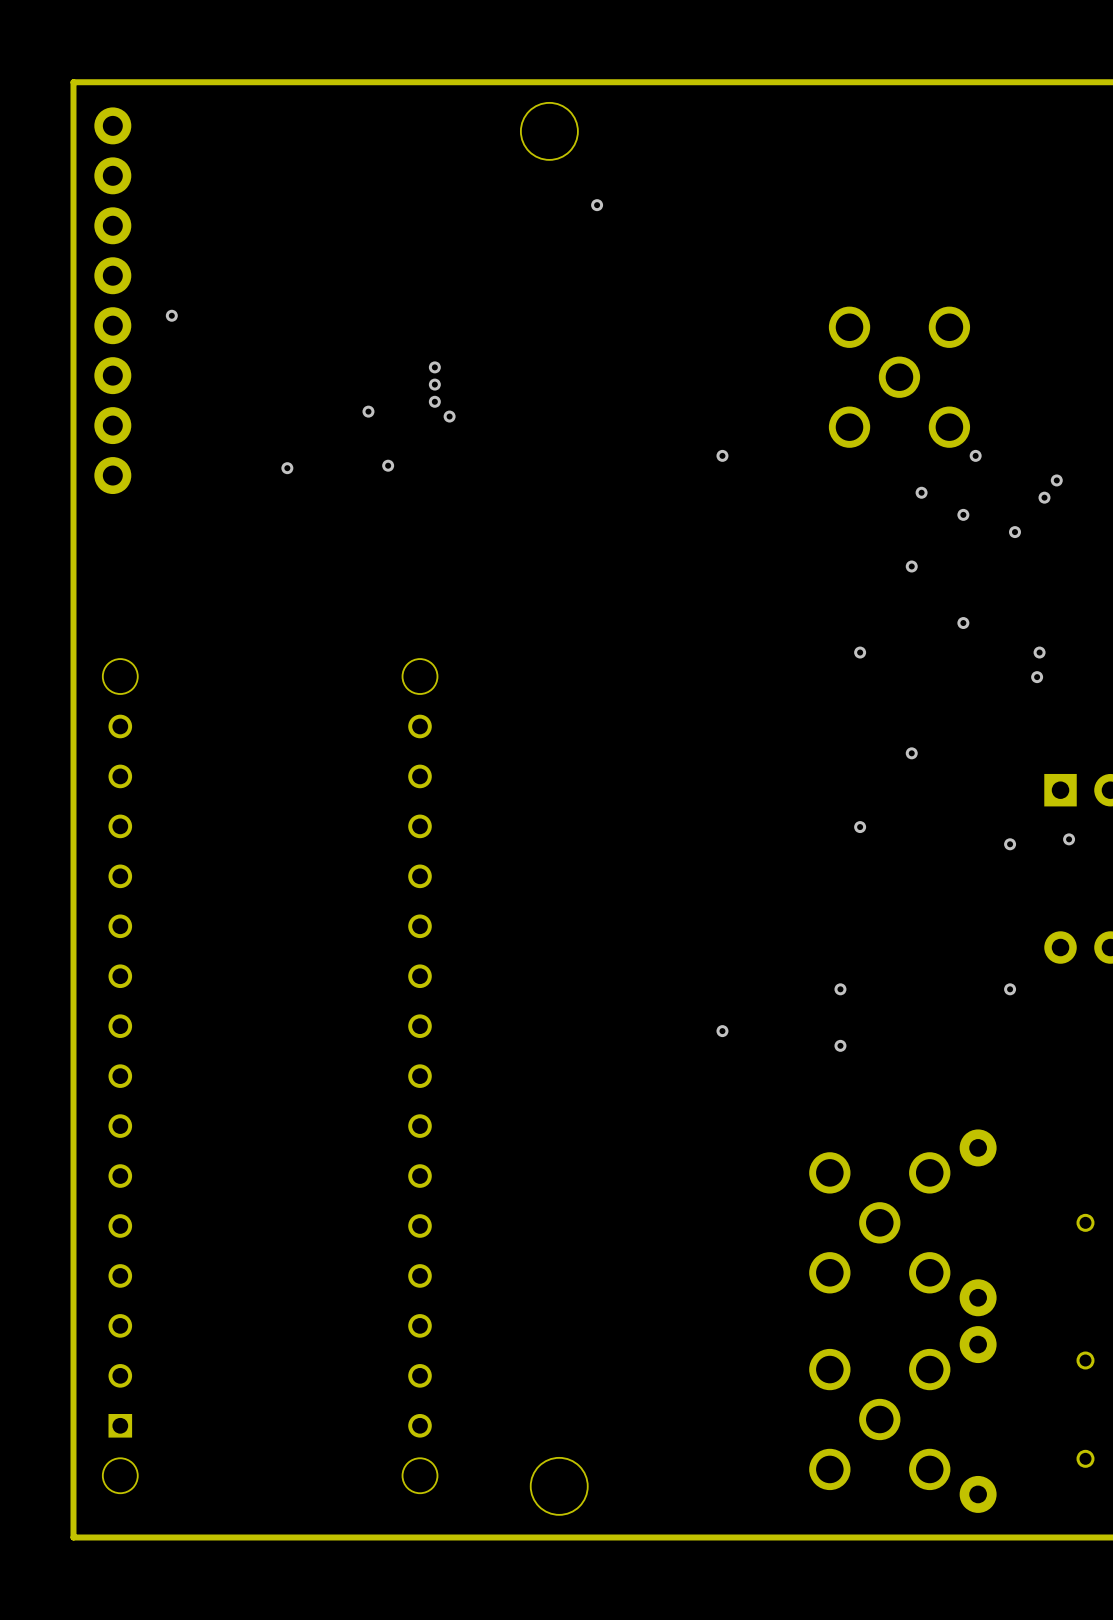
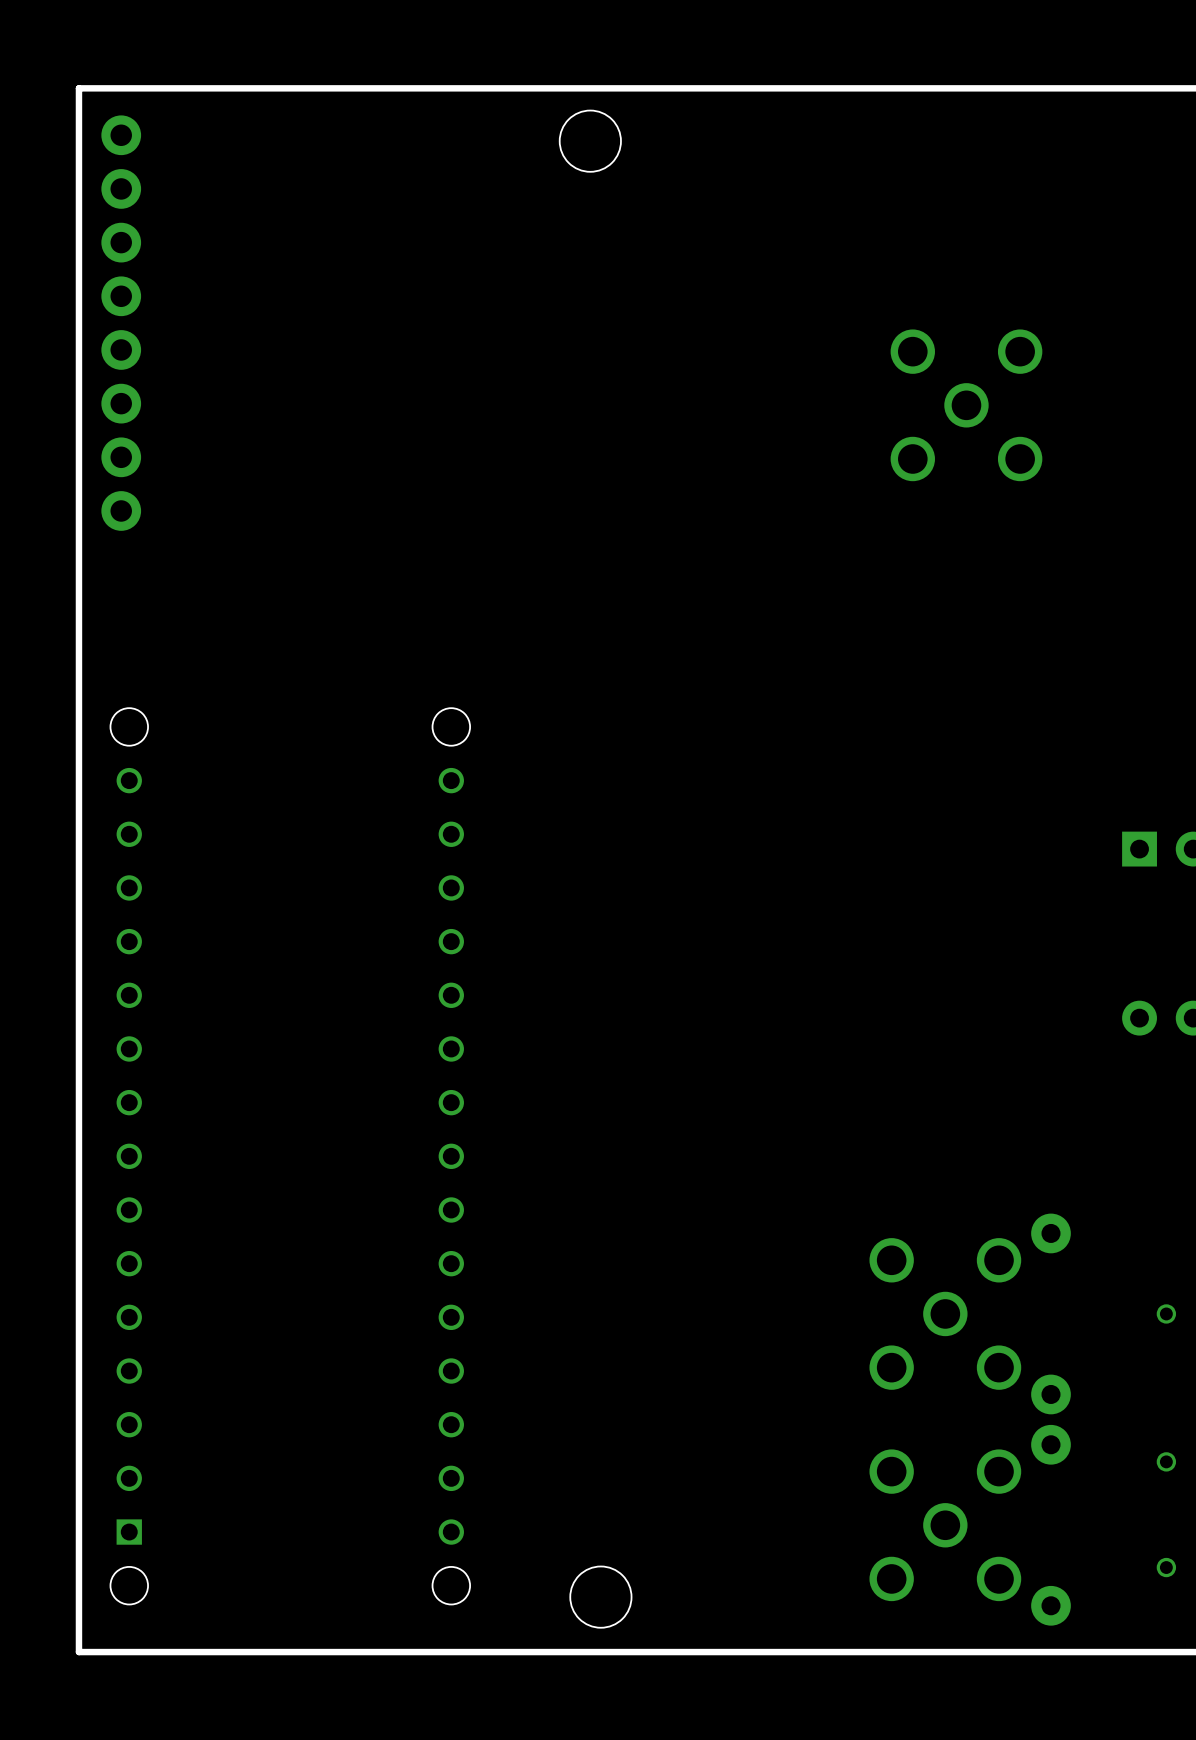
via: (597, 205) -> none
via: (171, 315) -> none
via: (434, 367) -> none
via: (434, 384) -> none
via: (434, 401) -> none
via: (368, 411) -> none
via: (449, 416) -> none
via: (722, 455) -> none
via: (975, 455) -> none
via: (388, 465) -> none
via: (287, 468) -> none
via: (1056, 480) -> none
via: (921, 492) -> none
via: (1044, 497) -> none
via: (963, 514) -> none
via: (1014, 532) -> none
via: (911, 566) -> none
via: (963, 623) -> none
via: (860, 652) -> none
via: (1039, 652) -> none
via: (1037, 677) -> none
via: (911, 753) -> none
via: (860, 827) -> none
via: (1069, 839) -> none
via: (1010, 844) -> none
via: (840, 989) -> none
via: (1010, 989) -> none
via: (722, 1031) -> none
via: (840, 1045) -> none

